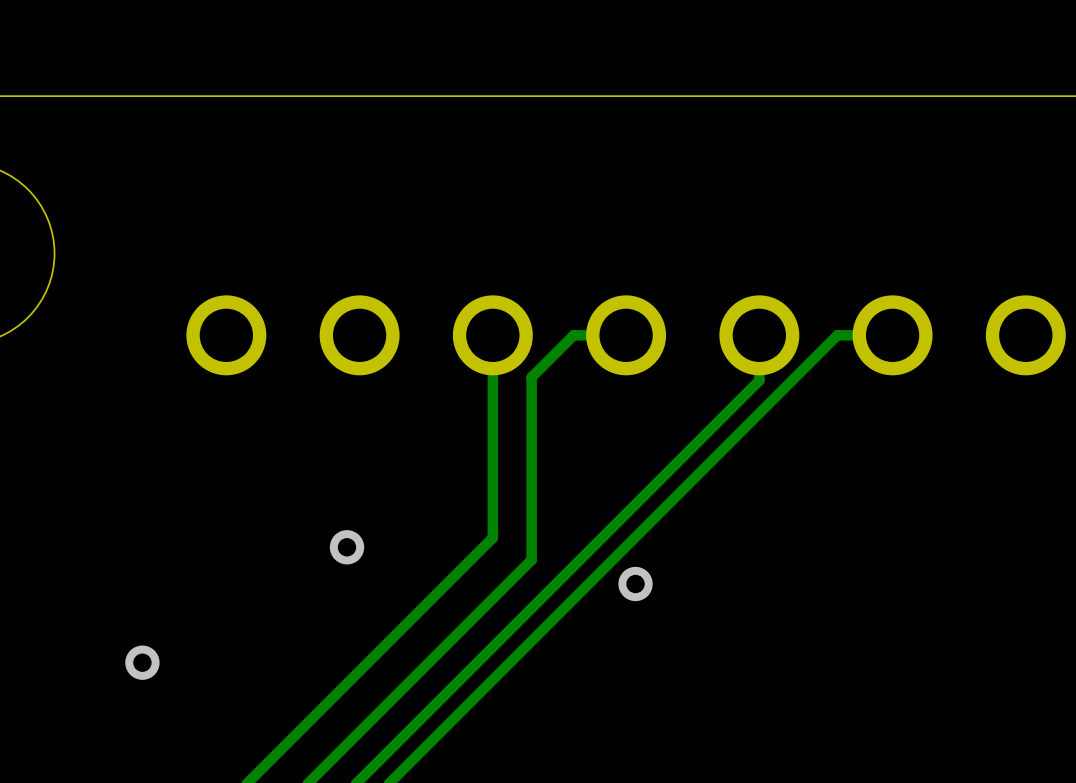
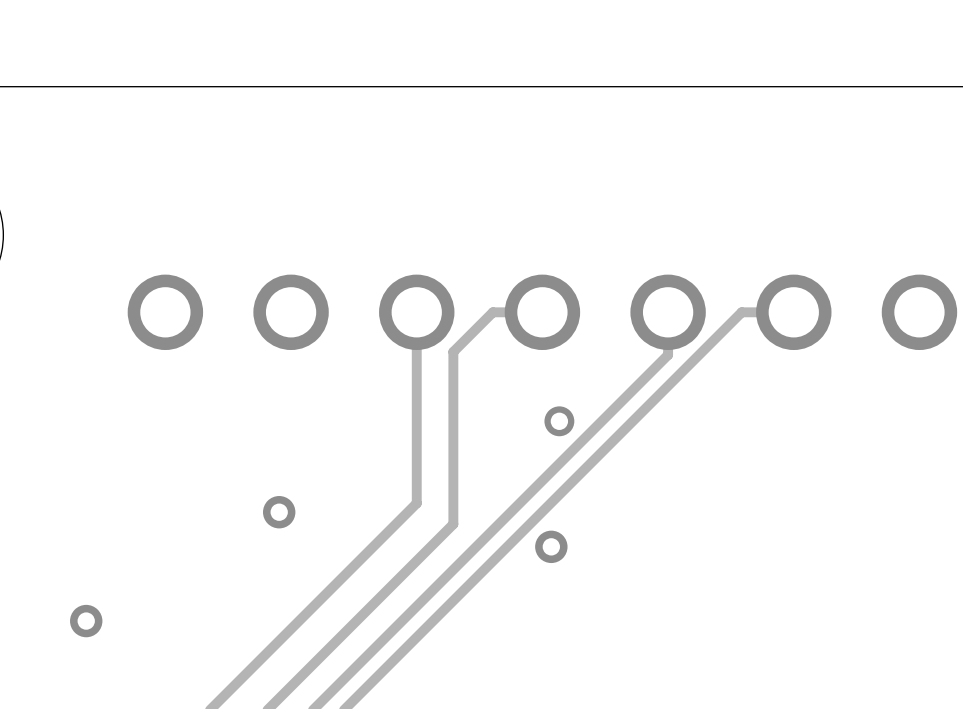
via: none -> (559, 421)

